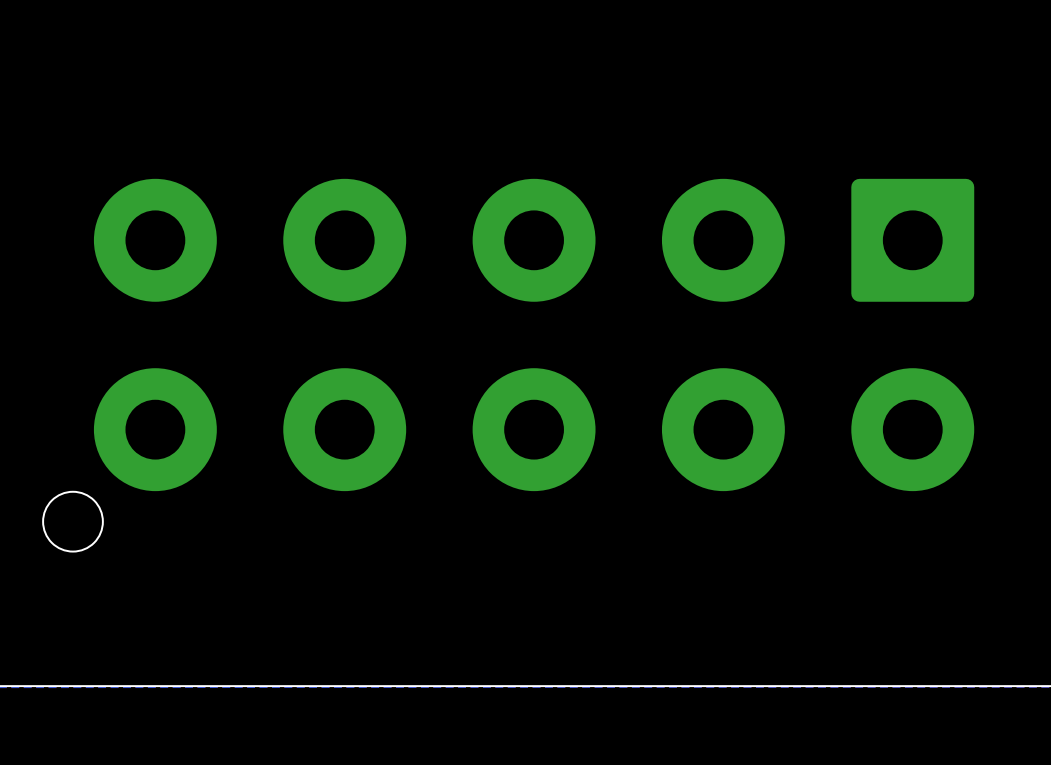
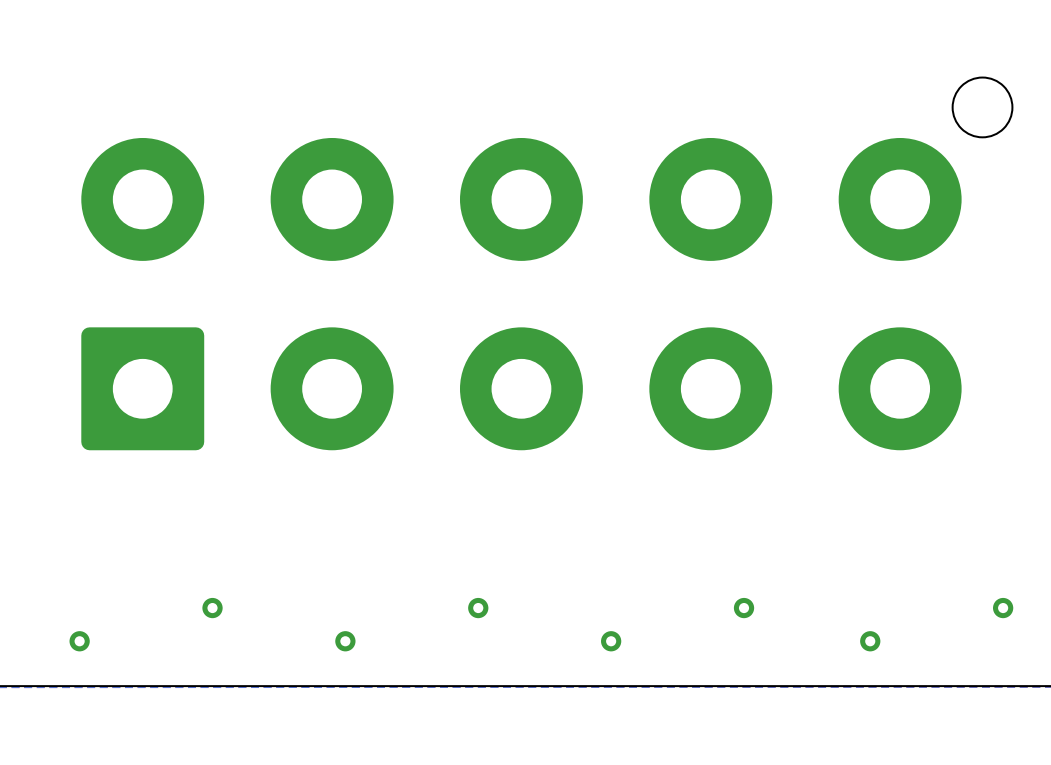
part rotation: 0° (508, 365) -> 180° (546, 263)
via: none -> (212, 608)
via: none -> (478, 608)
via: none -> (744, 608)
via: none -> (1003, 608)
via: none -> (79, 641)
via: none -> (345, 641)
via: none -> (611, 641)
via: none -> (870, 641)

